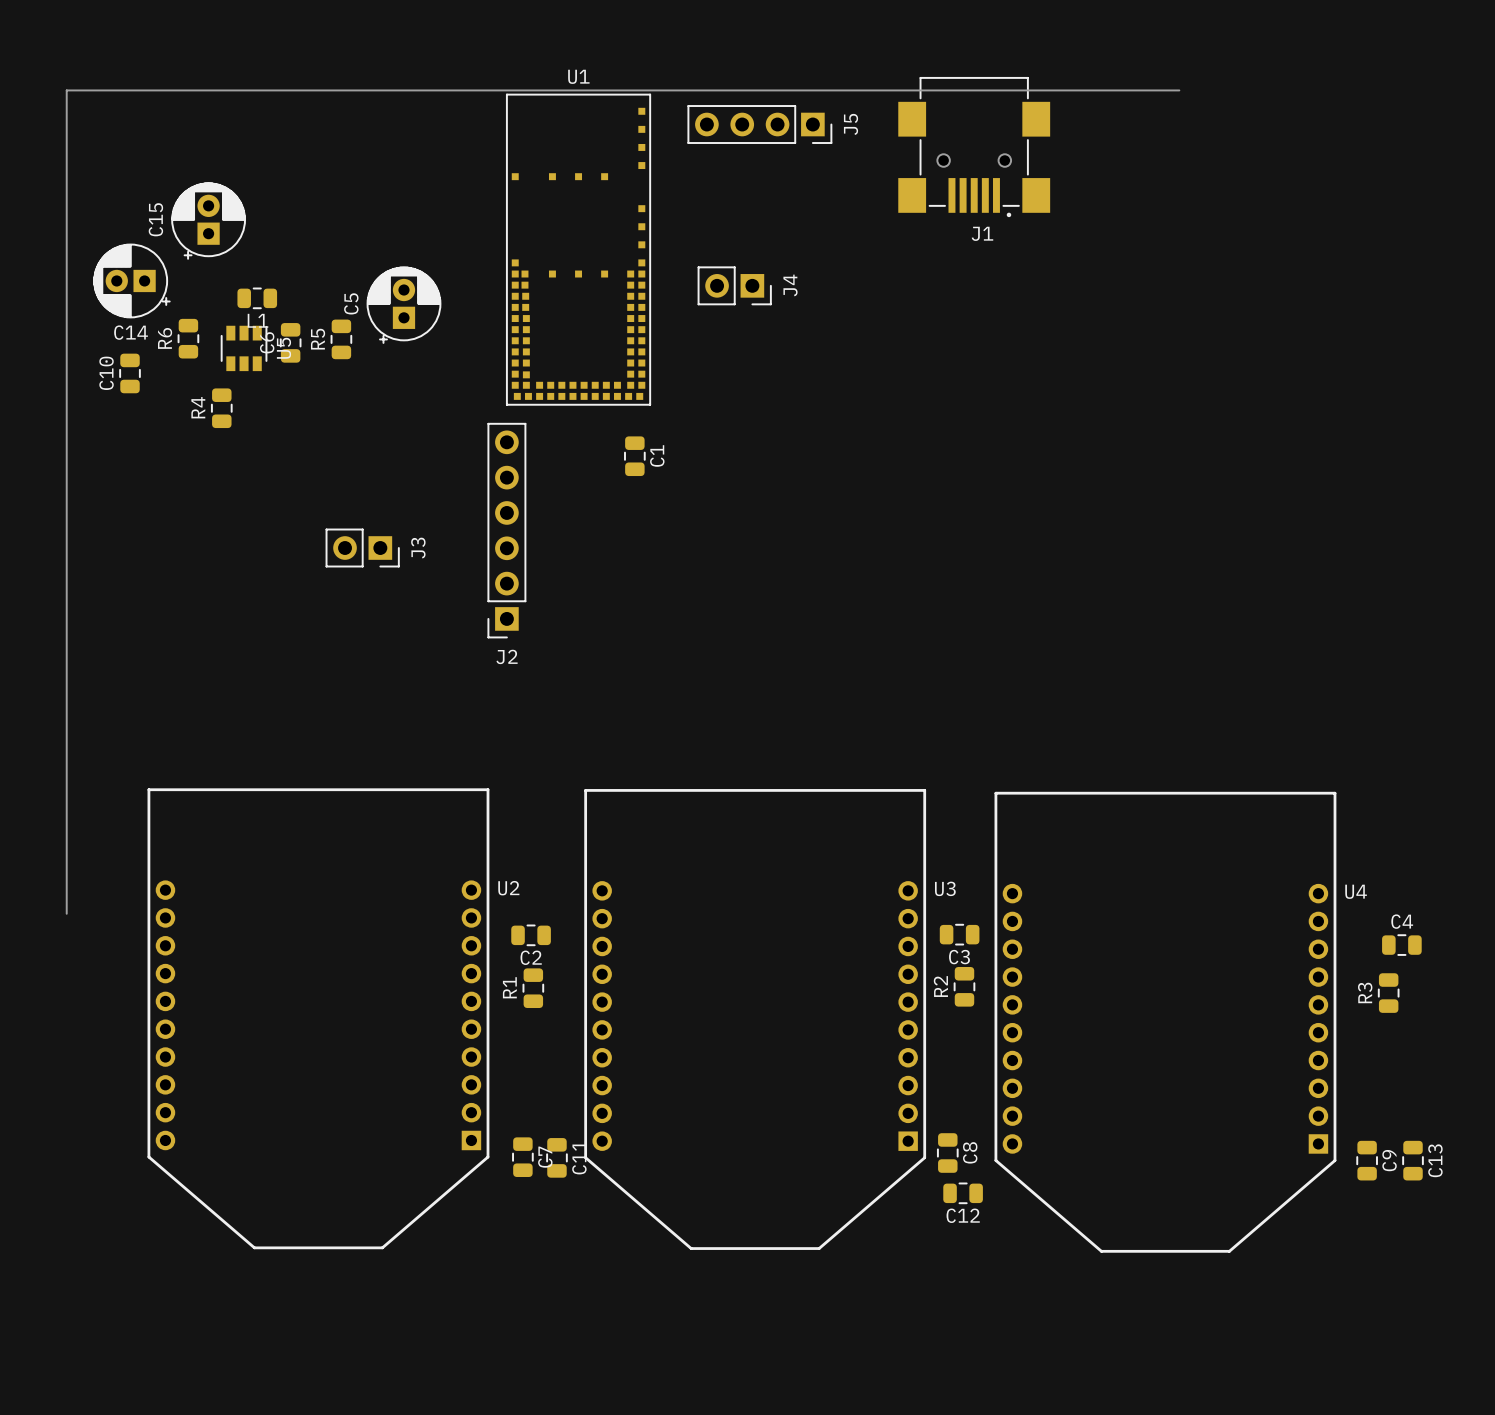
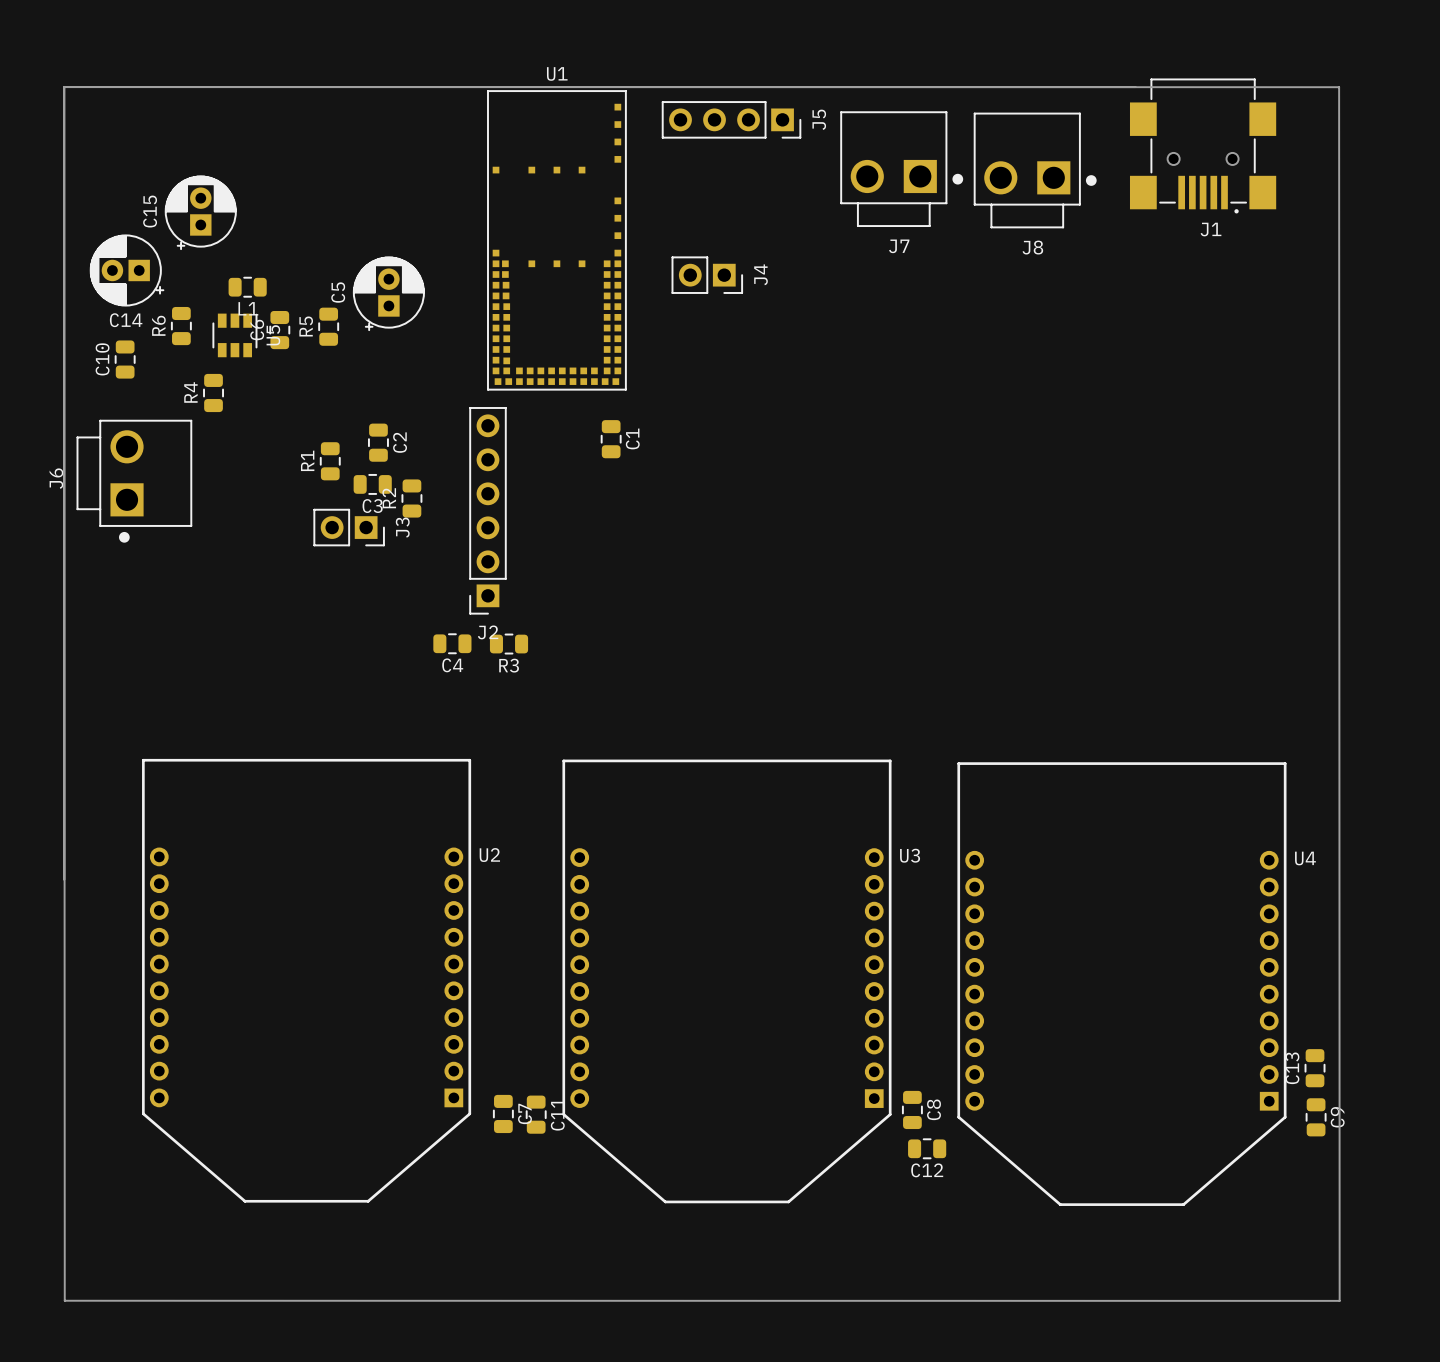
board edge: none -> (64, 87) (1339, 87) (1339, 1300) (64, 1300) (64, 87)
J1 position: (974, 147) -> (1203, 146)
J7: none -> (901, 169)
J8: none -> (1035, 170)
J6: none -> (134, 481)
C4 name position: C4 (1402, 921) -> C4 (452, 665)
C3 position: (959, 934) -> (372, 484)
C2 rotation: 0° (531, 935) -> 90° clockwise (378, 442)
C2 position: (531, 935) -> (378, 442)
C4 position: (1401, 945) -> (452, 643)
C2 name position: C2 (531, 957) -> C2 (400, 442)
R2 position: (964, 986) -> (411, 498)
R1 position: (533, 988) -> (330, 461)
R3 name position: R3 (1365, 992) -> R3 (509, 665)
R3 rotation: 0° (1388, 993) -> 90° clockwise (509, 644)
R3 position: (1388, 993) -> (509, 644)
C13 position: (1413, 1160) -> (1315, 1068)
C13 name position: C13 (1435, 1160) -> C13 (1292, 1068)

